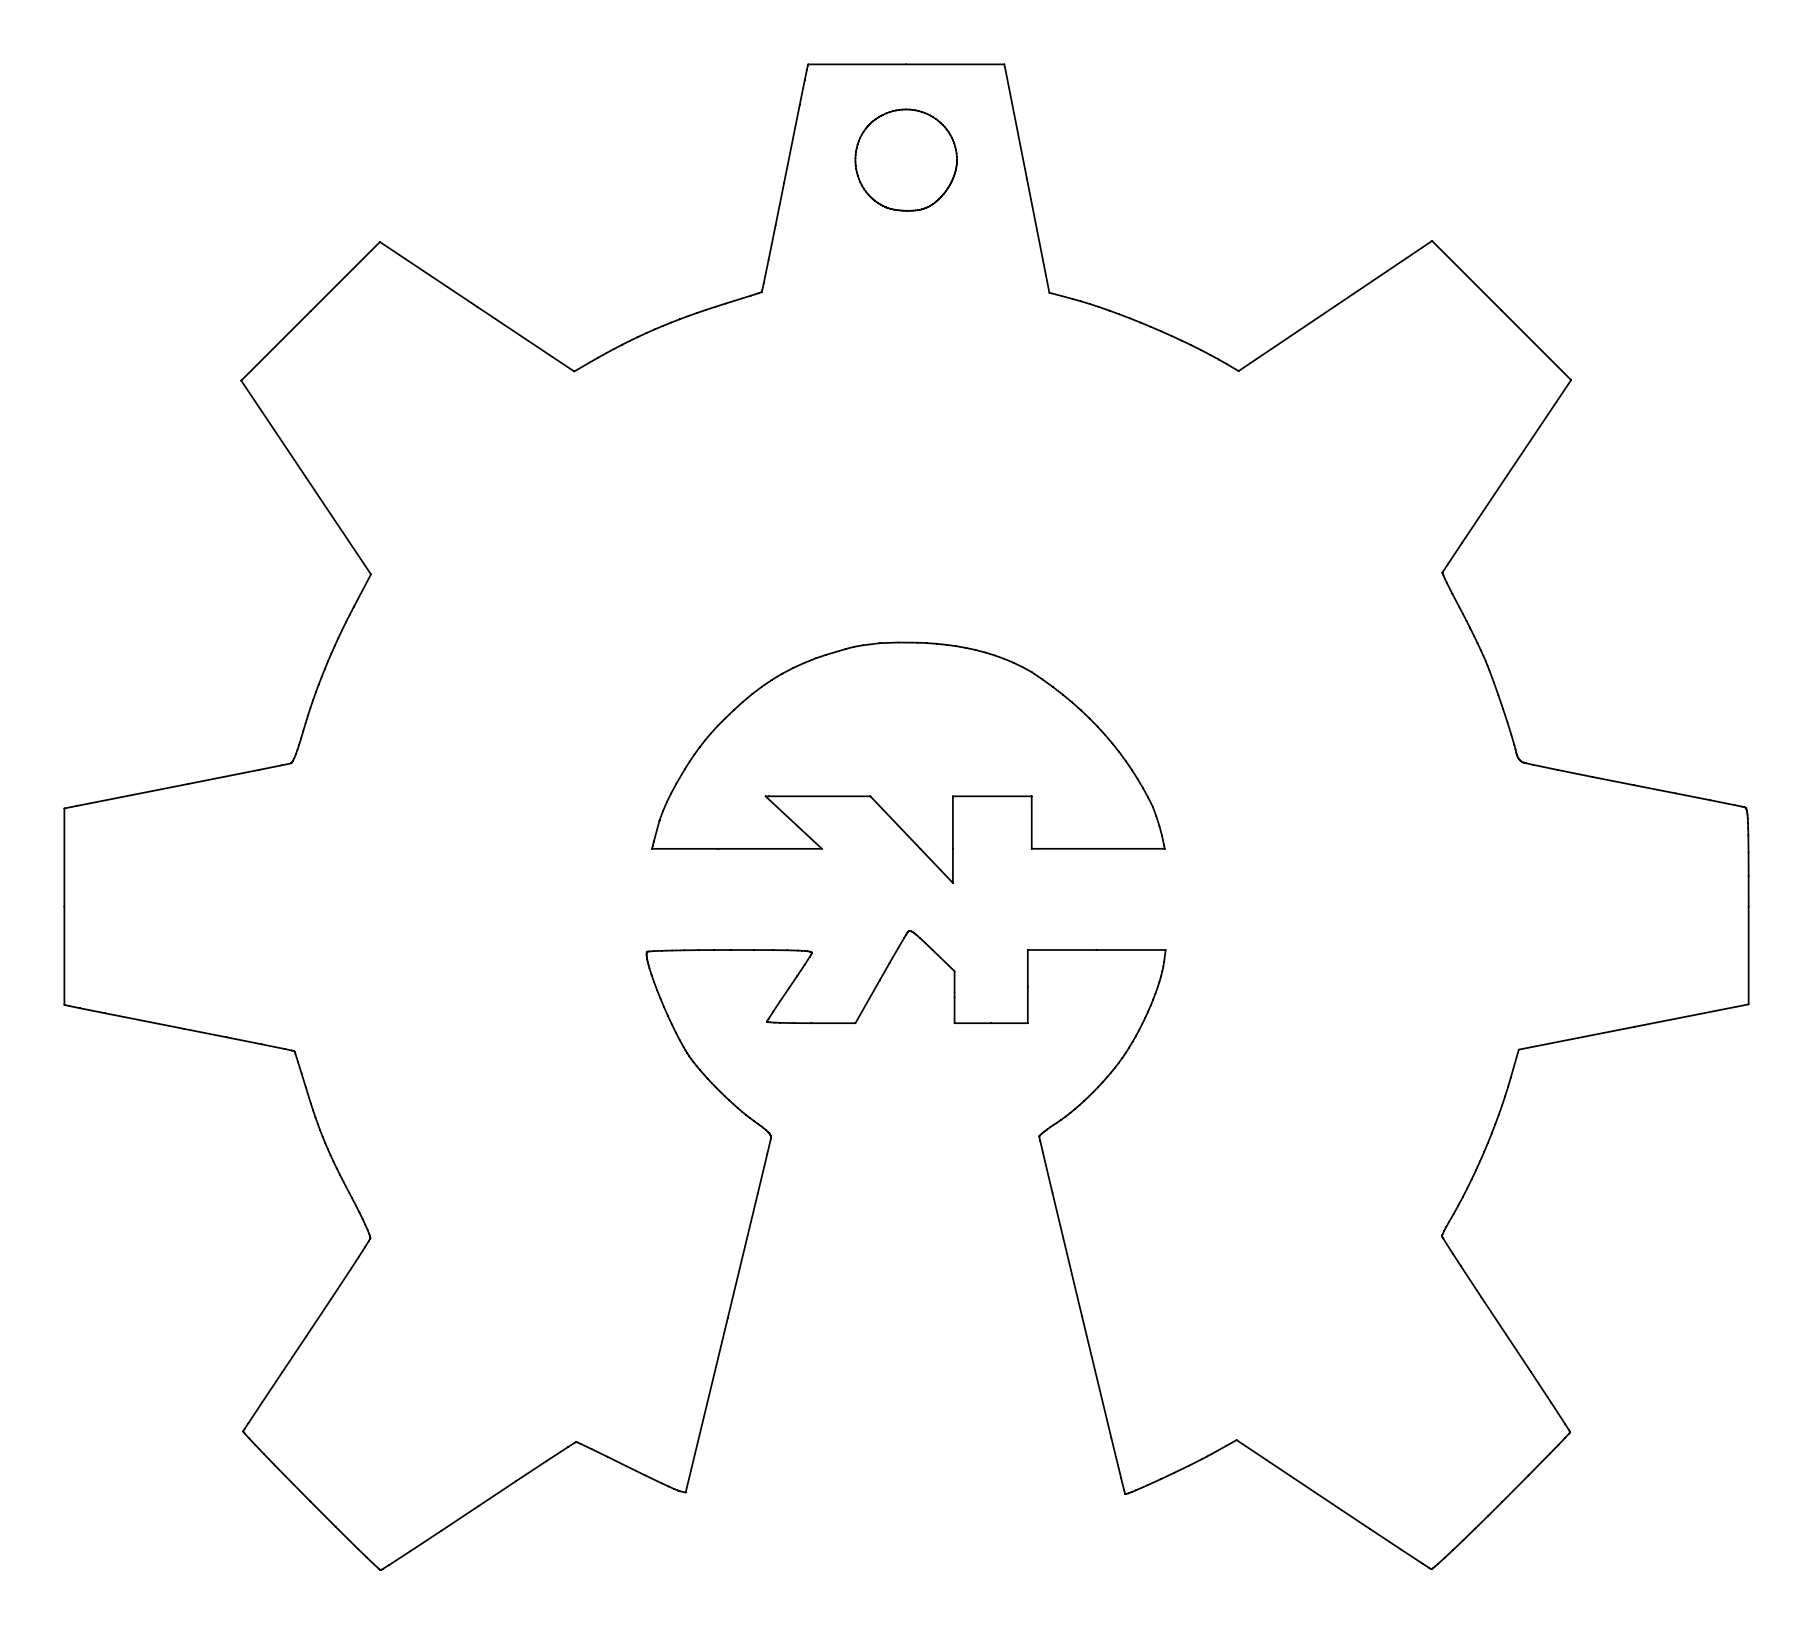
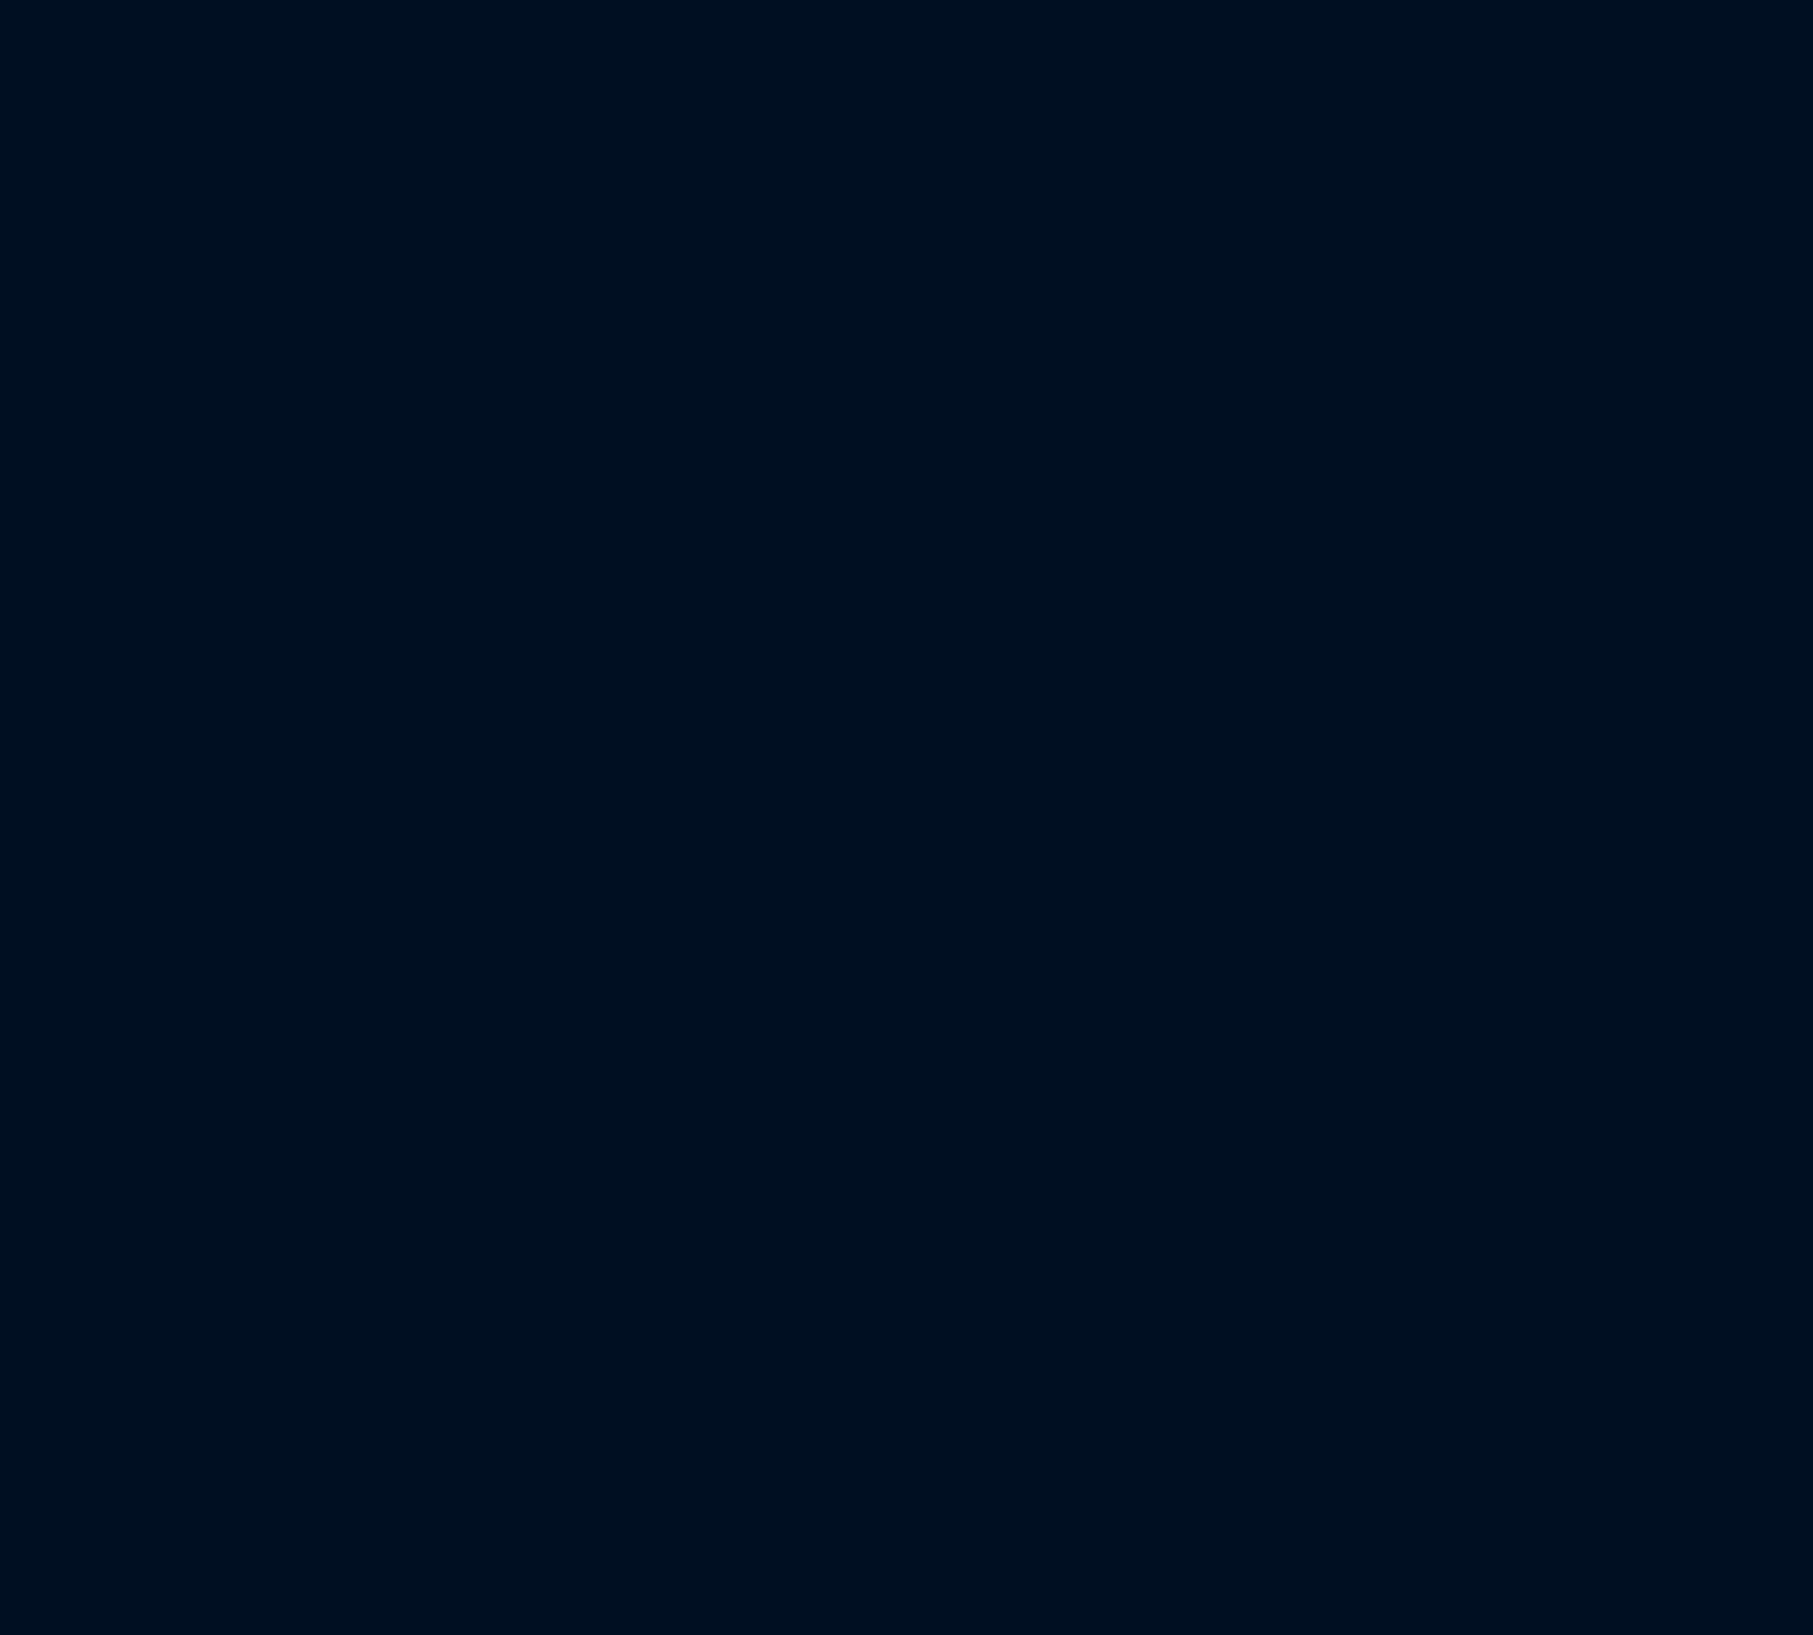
drawing: [63, 63, 1750, 1572] -> none

